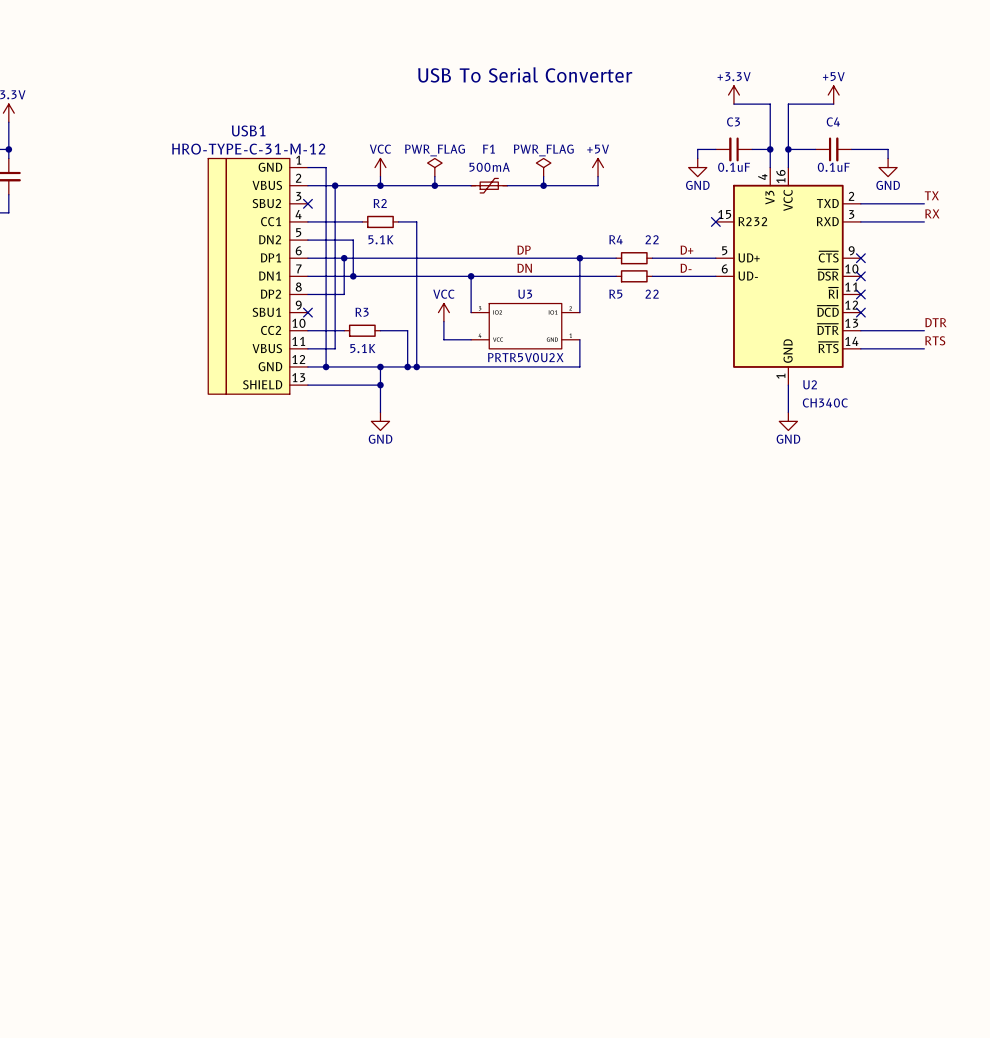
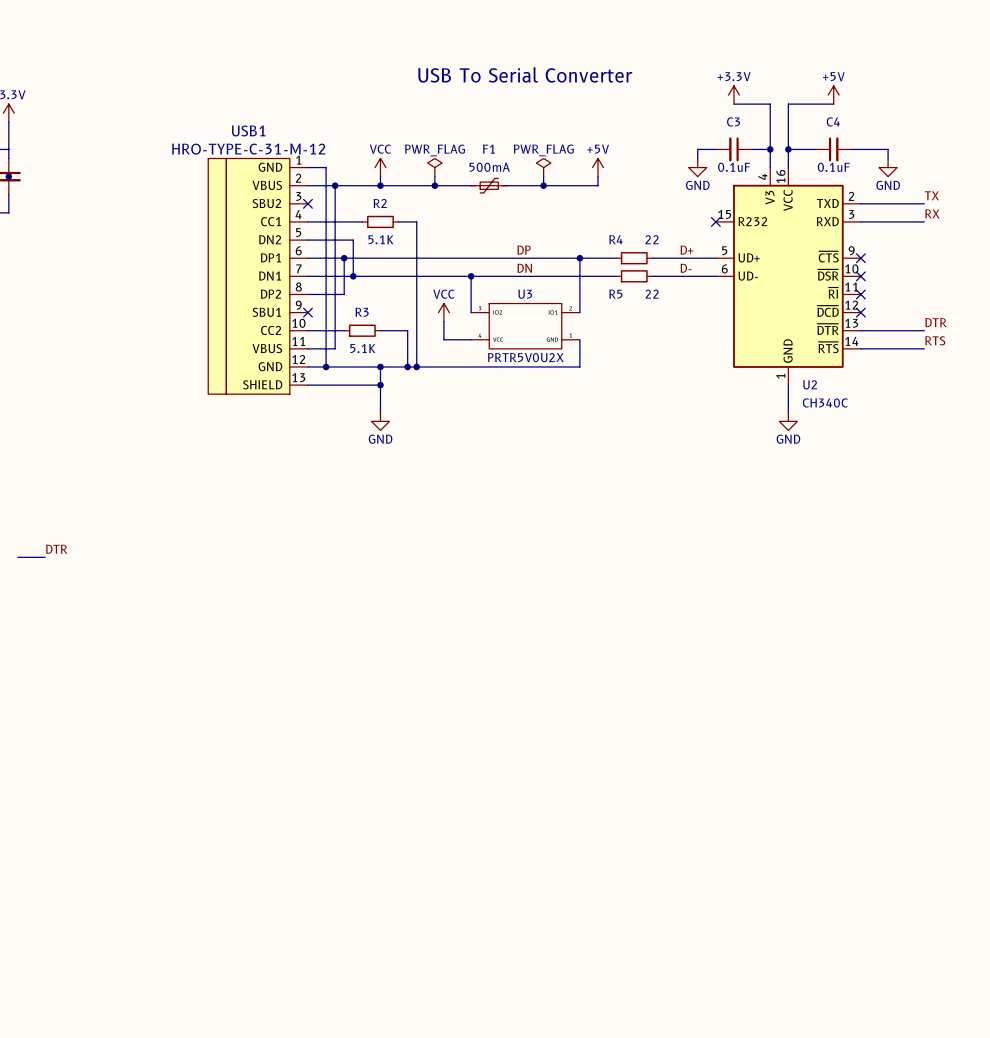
junction position: (8, 149) -> (8, 176)
label: none -> DTR (56, 549)
wire: none -> (17, 557) (45, 557)

